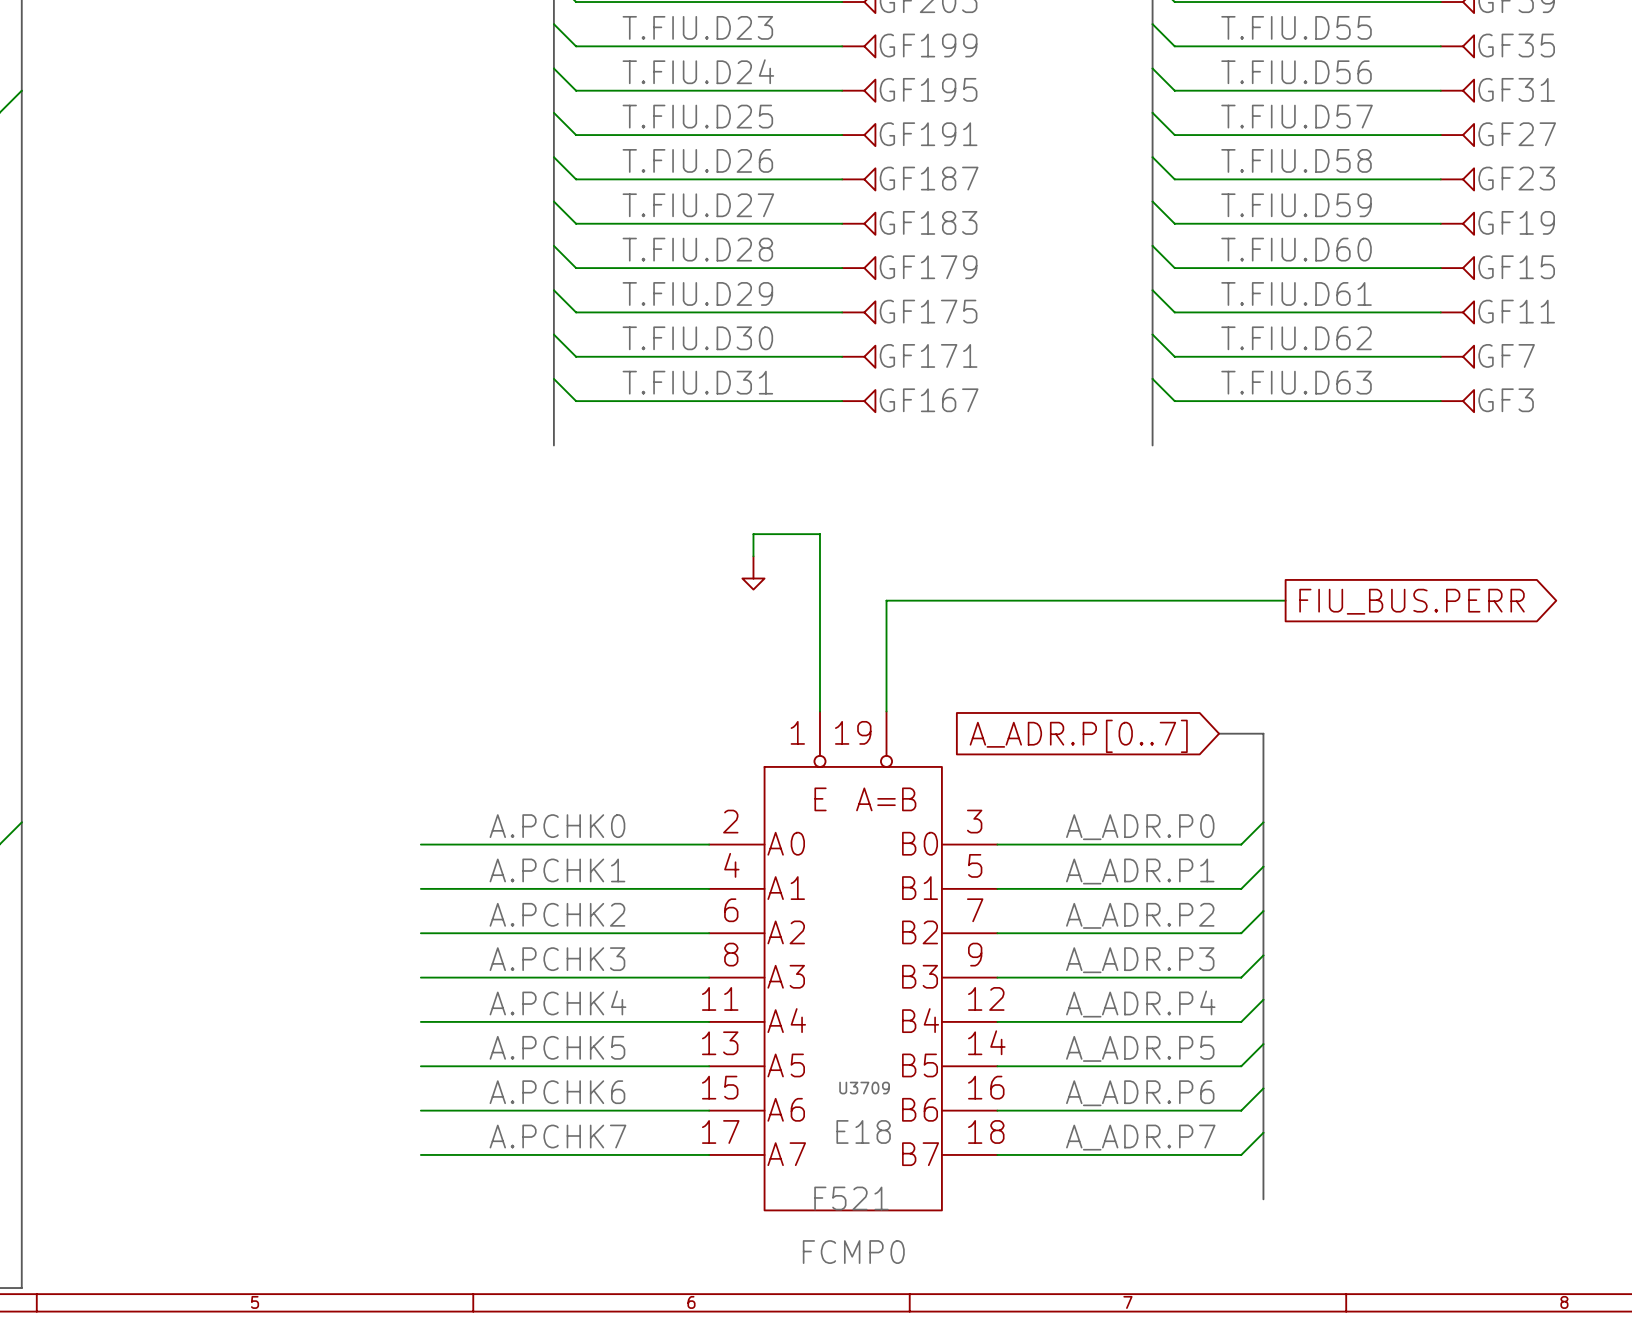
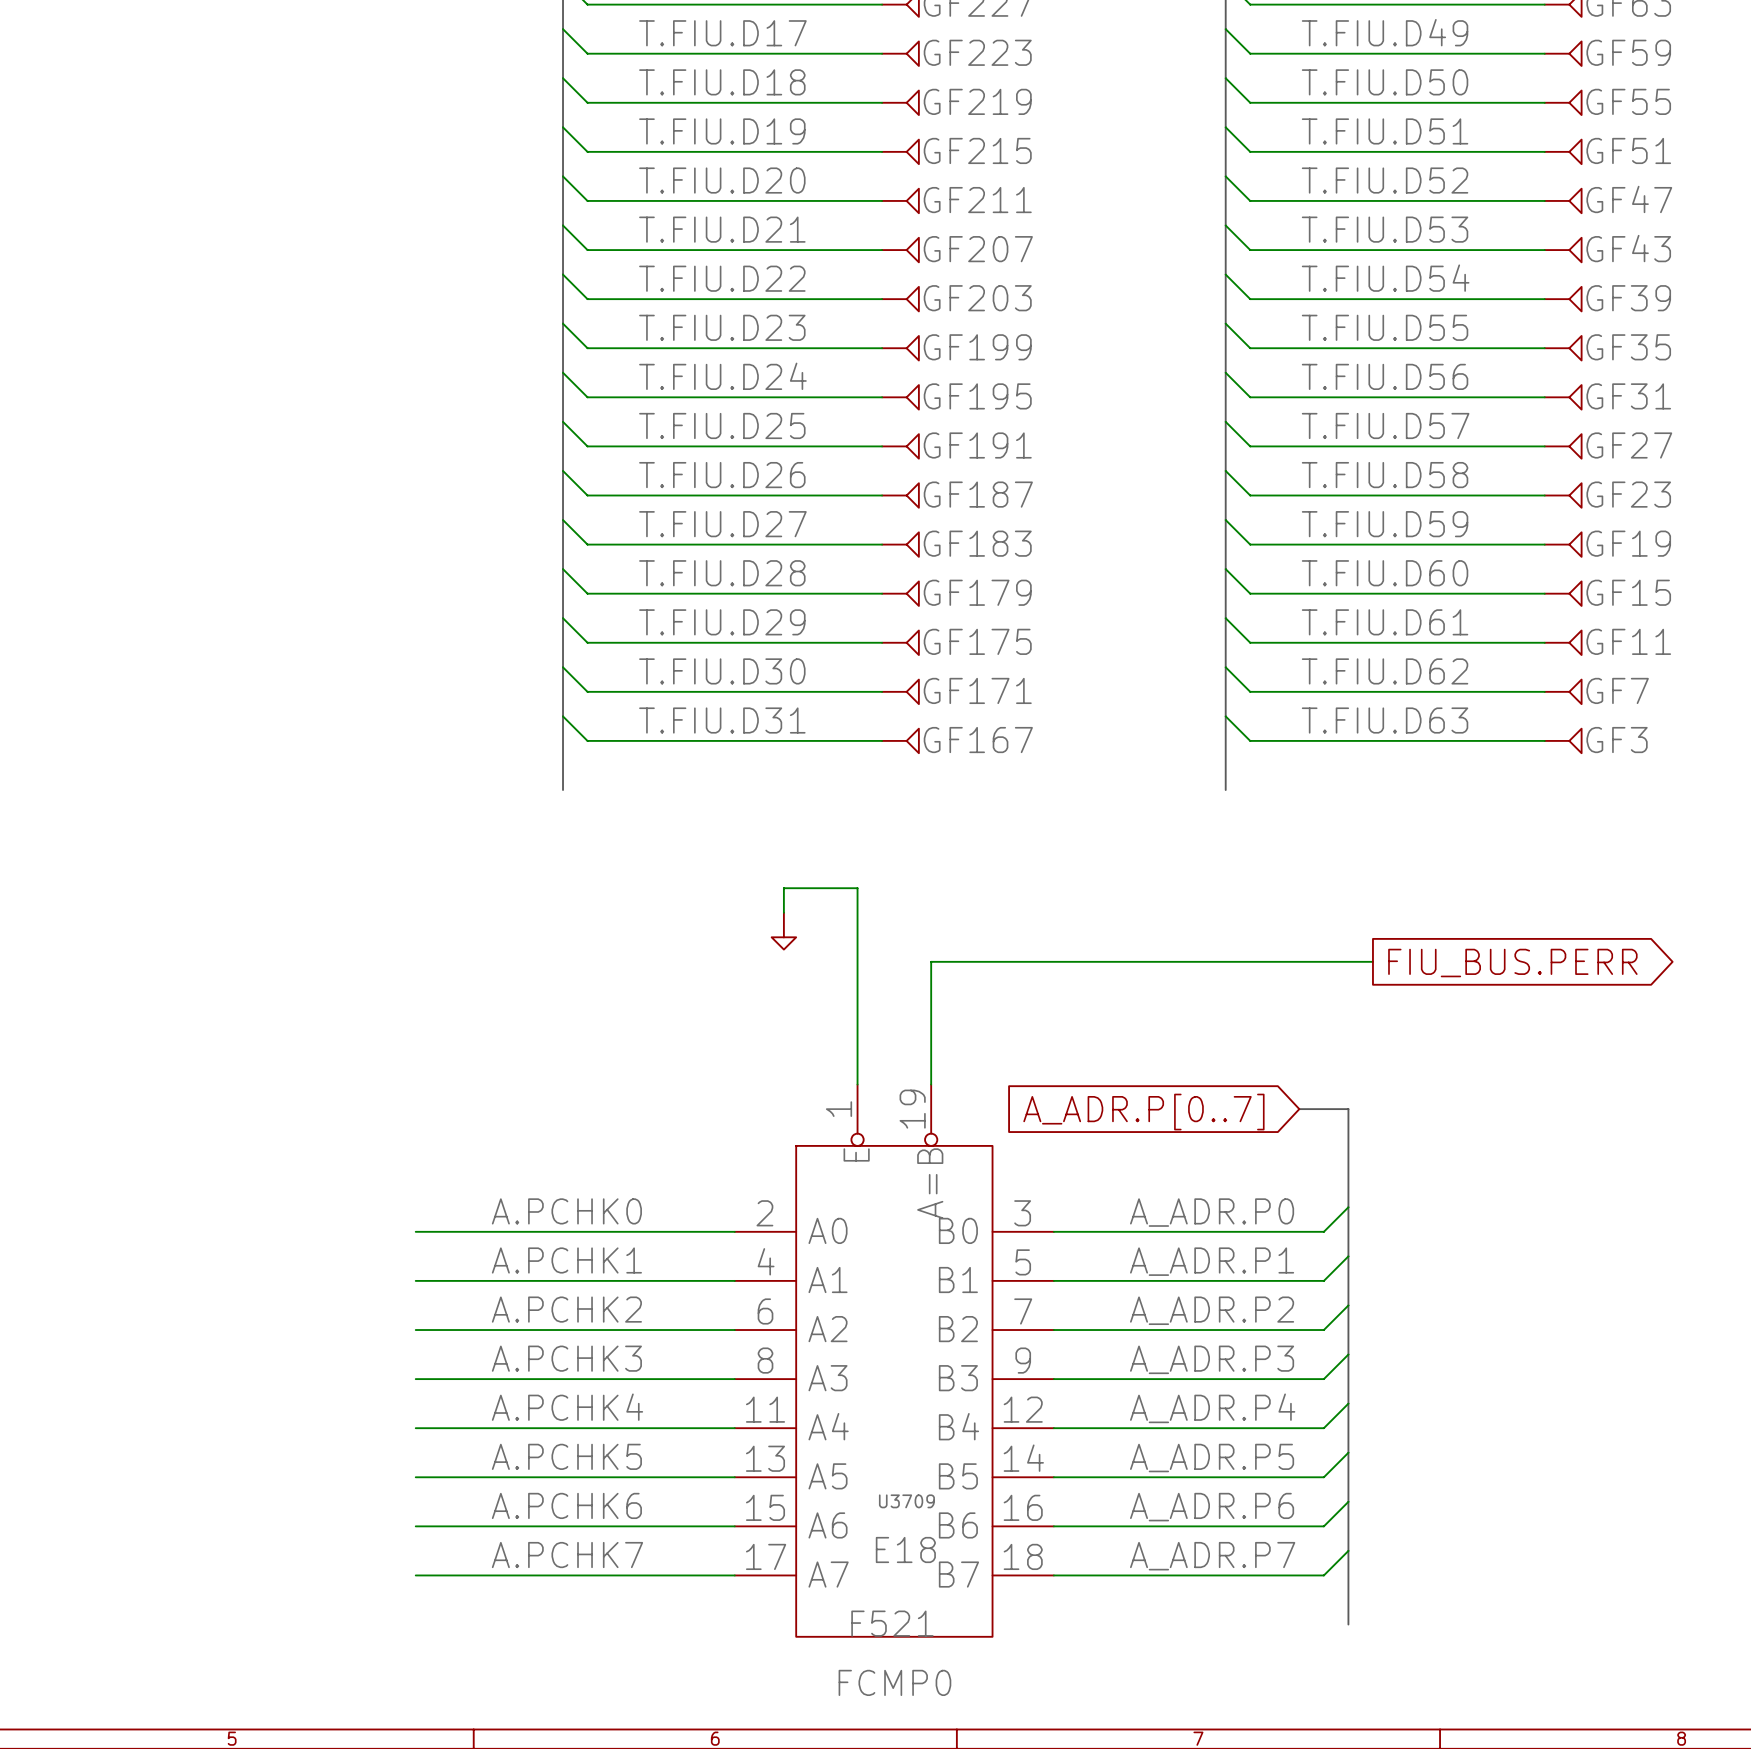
U3709 symbol: [709, 711, 998, 1211] -> [734, 1084, 1054, 1637]

